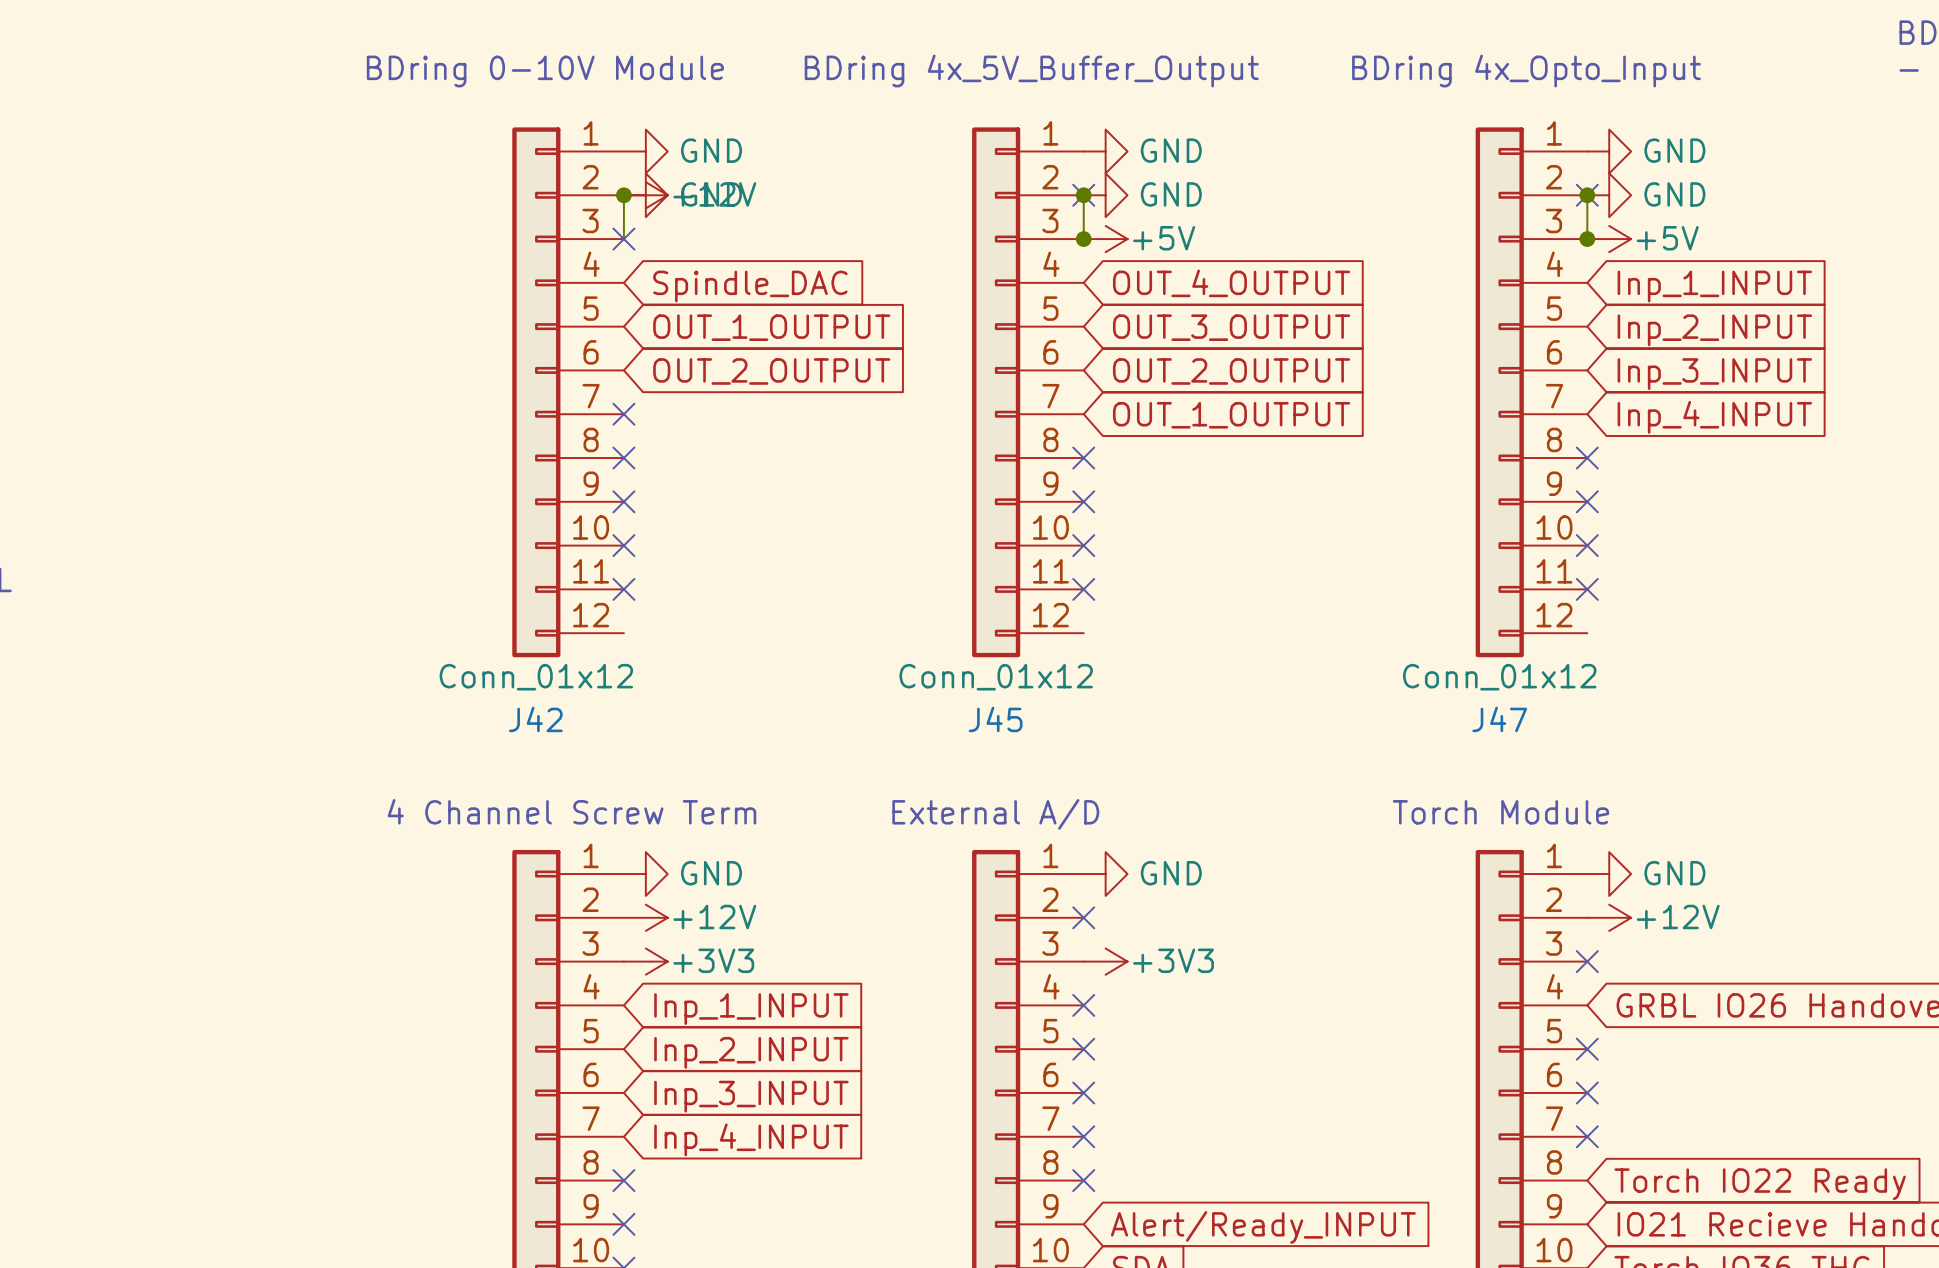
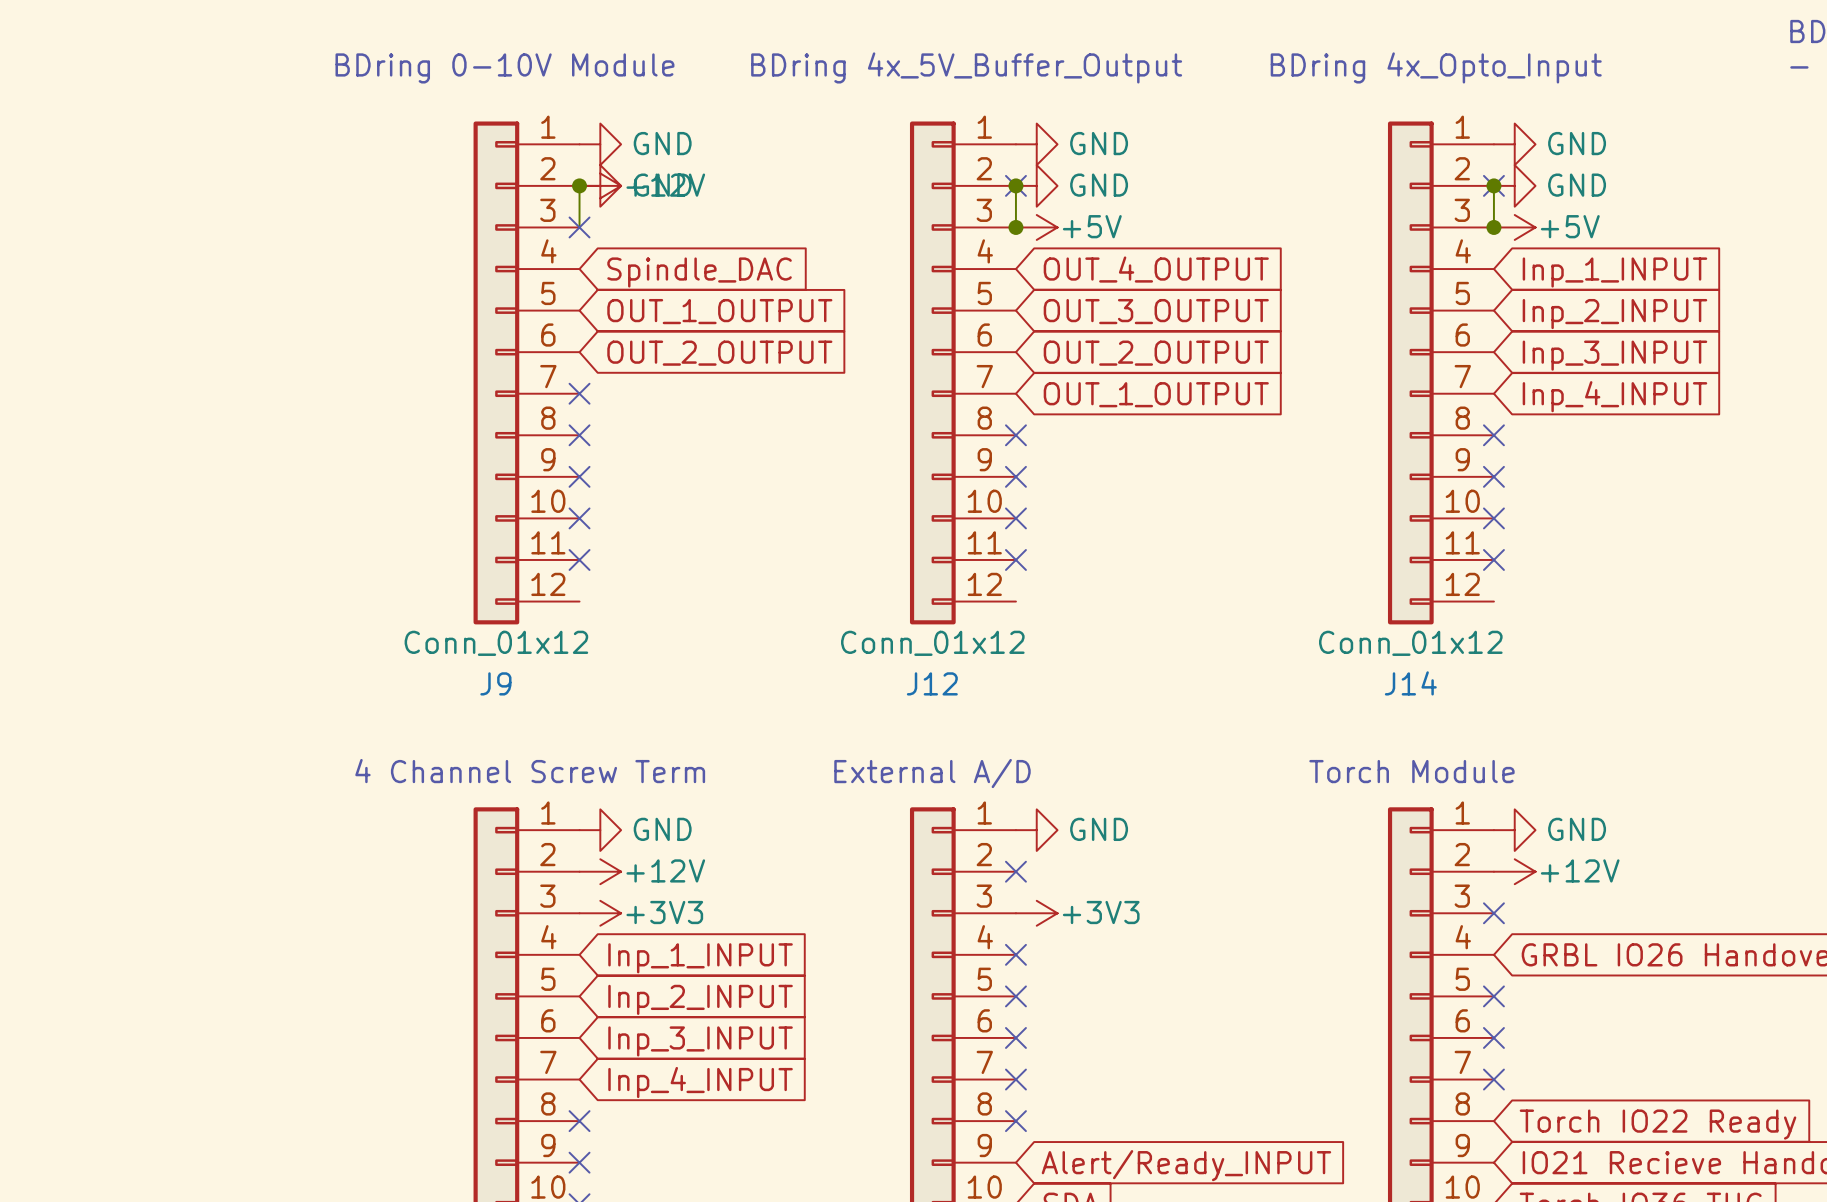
J42 name: J42 (535, 719) -> J9 (495, 683)
J45 name: J45 (995, 719) -> J12 (932, 683)
J47 name: J47 (1499, 719) -> J14 (1410, 683)

